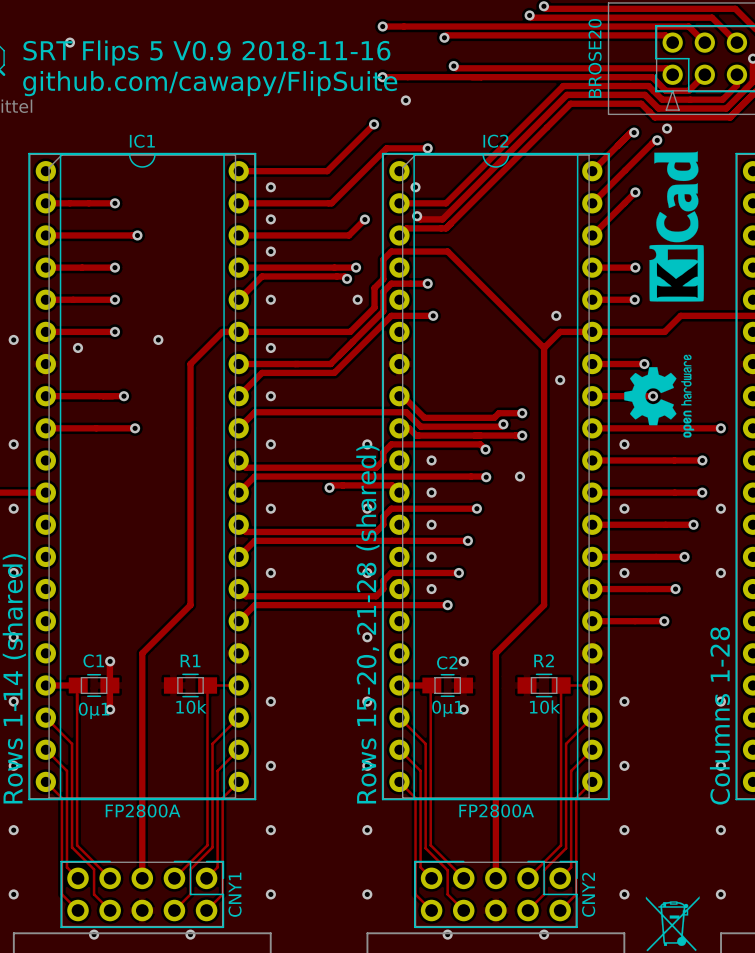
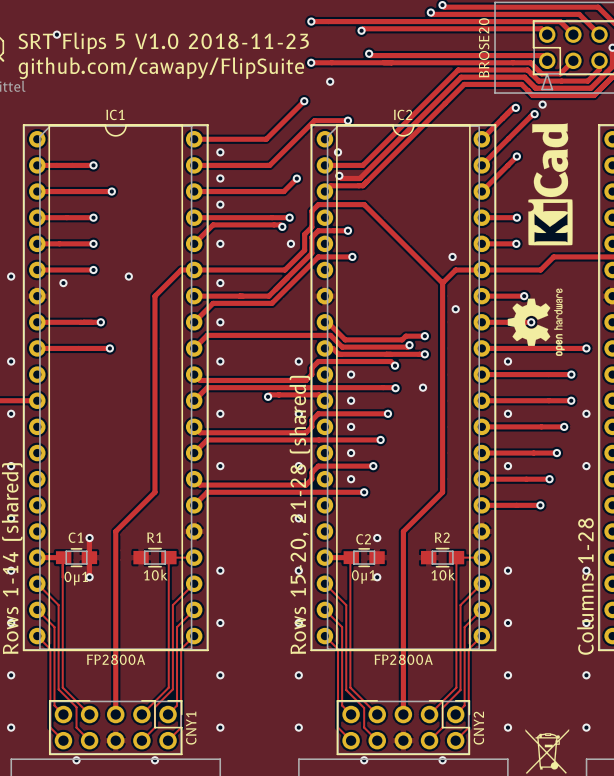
text: SRT Flips 5 V0.9 2018-11-16 (206, 53) -> SRT Flips 5 V1.0 2018-11-23 (163, 43)

